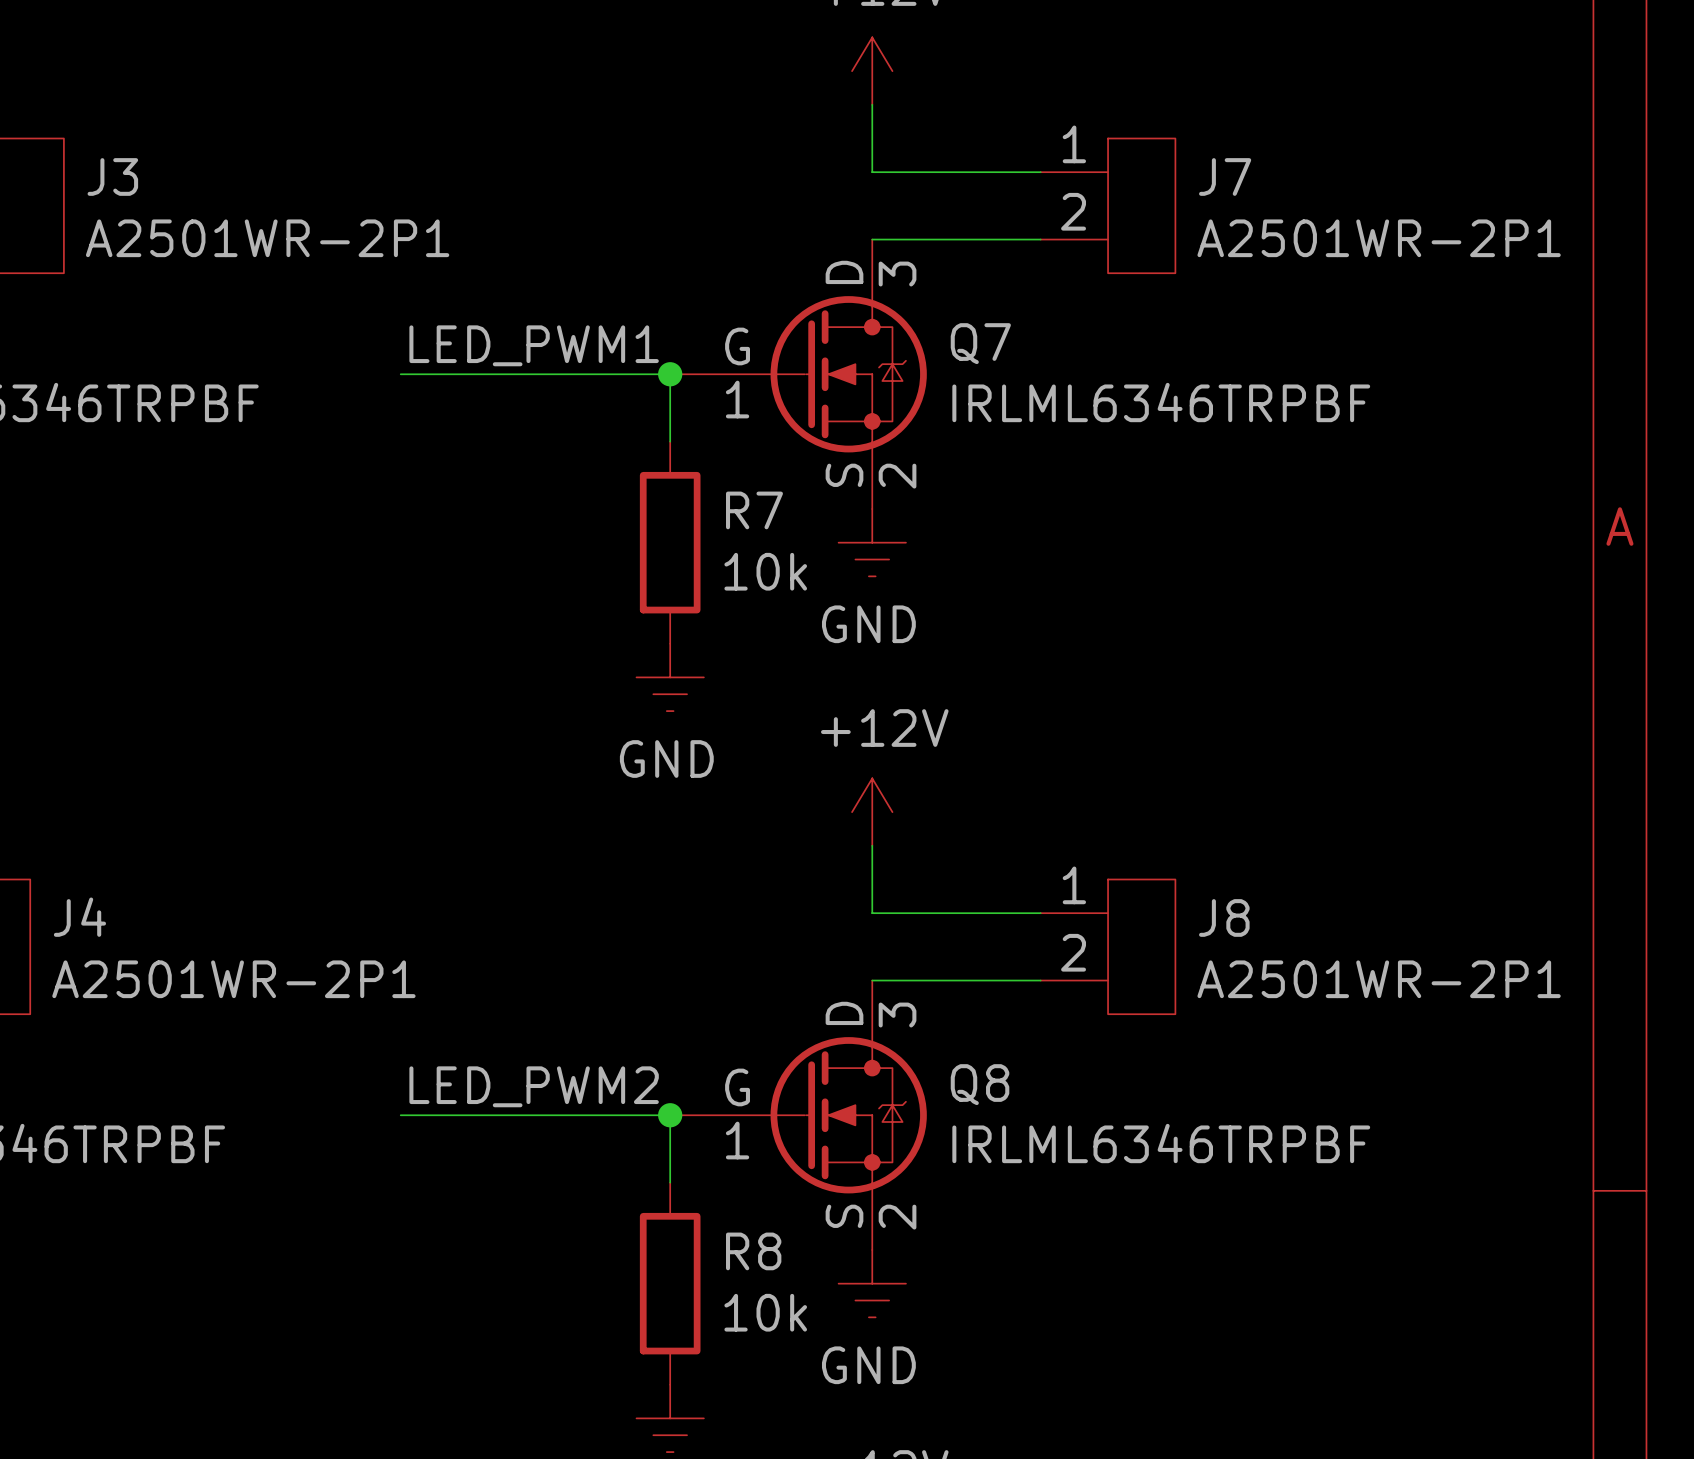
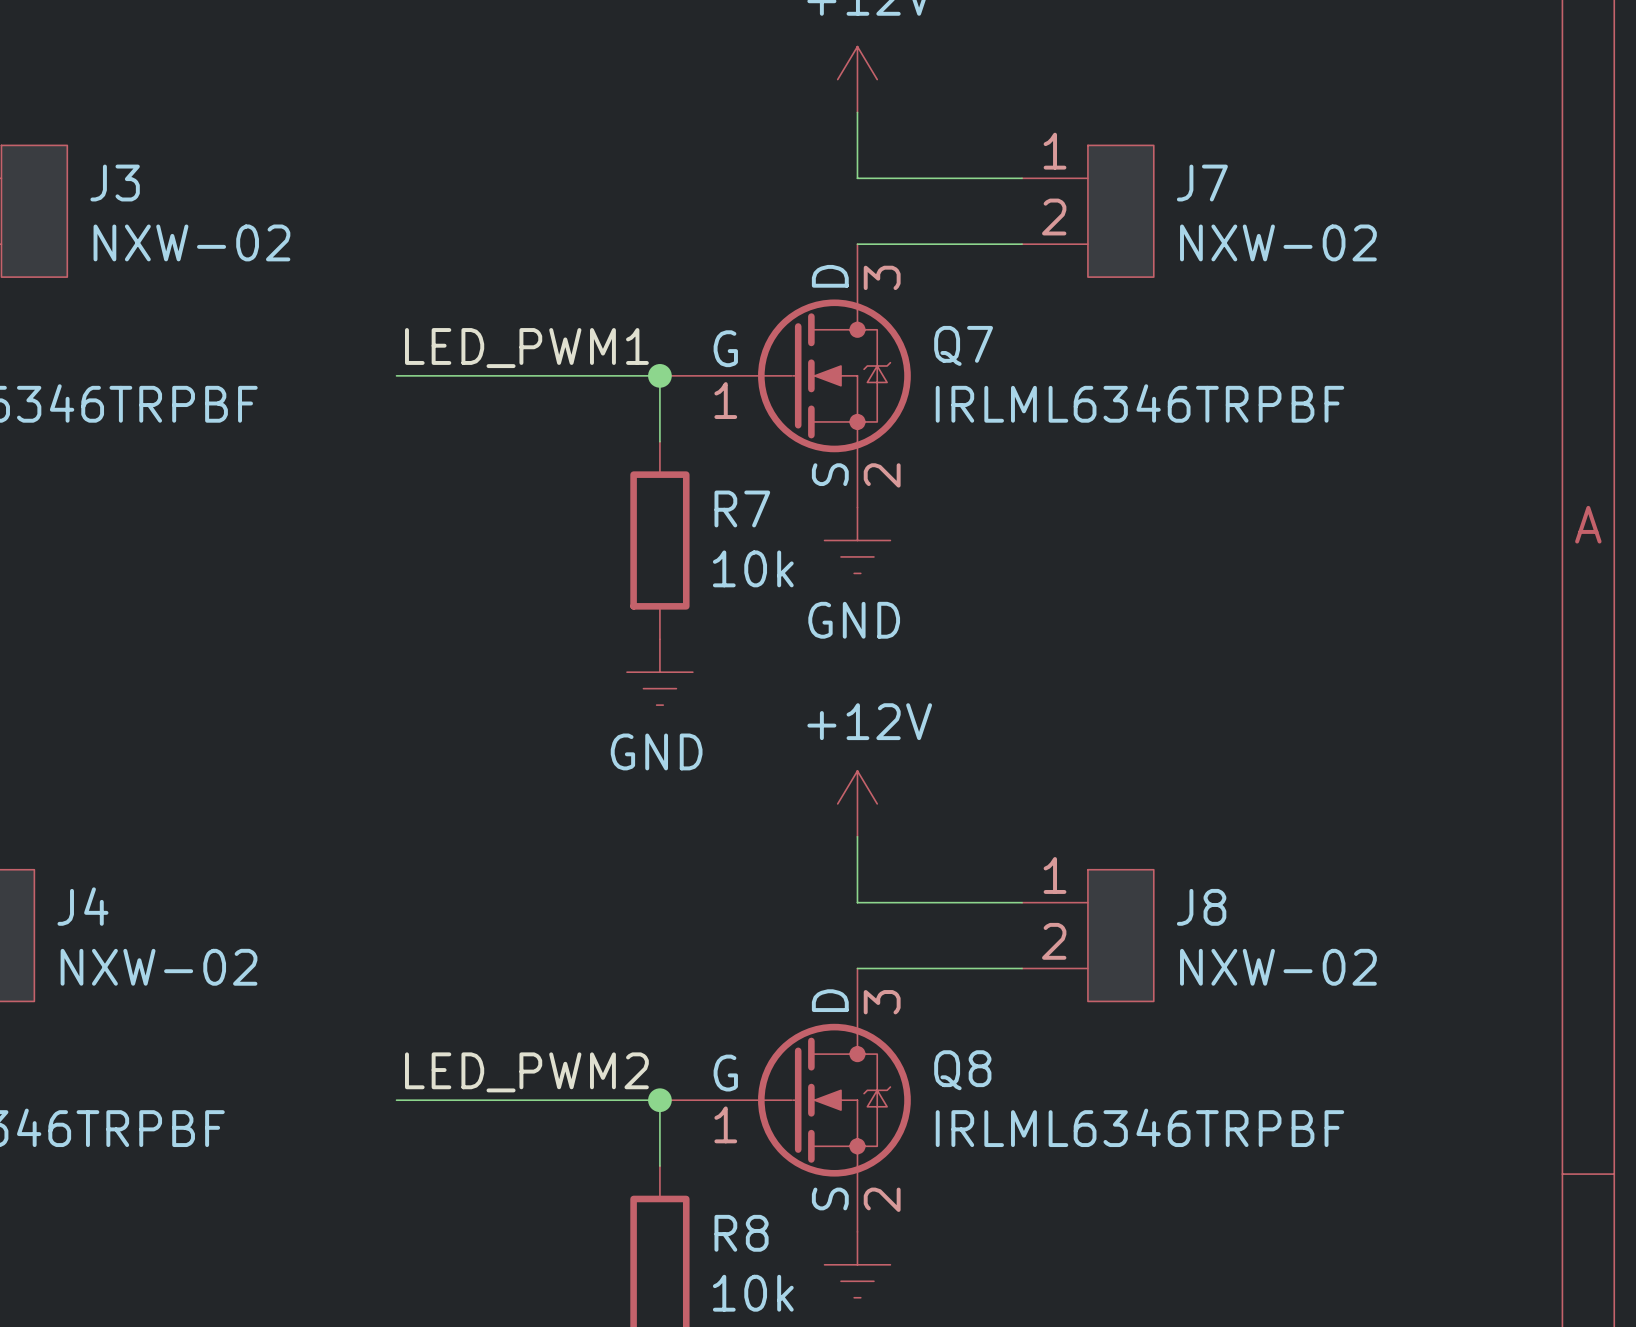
J3 value: A2501WR-2P1 (267, 238) -> NXW-02 (191, 242)
J7 value: A2501WR-2P1 (1379, 238) -> NXW-02 (1278, 242)
J4 value: A2501WR-2P1 (233, 979) -> NXW-02 (159, 967)
J8 value: A2501WR-2P1 (1379, 979) -> NXW-02 (1278, 967)

